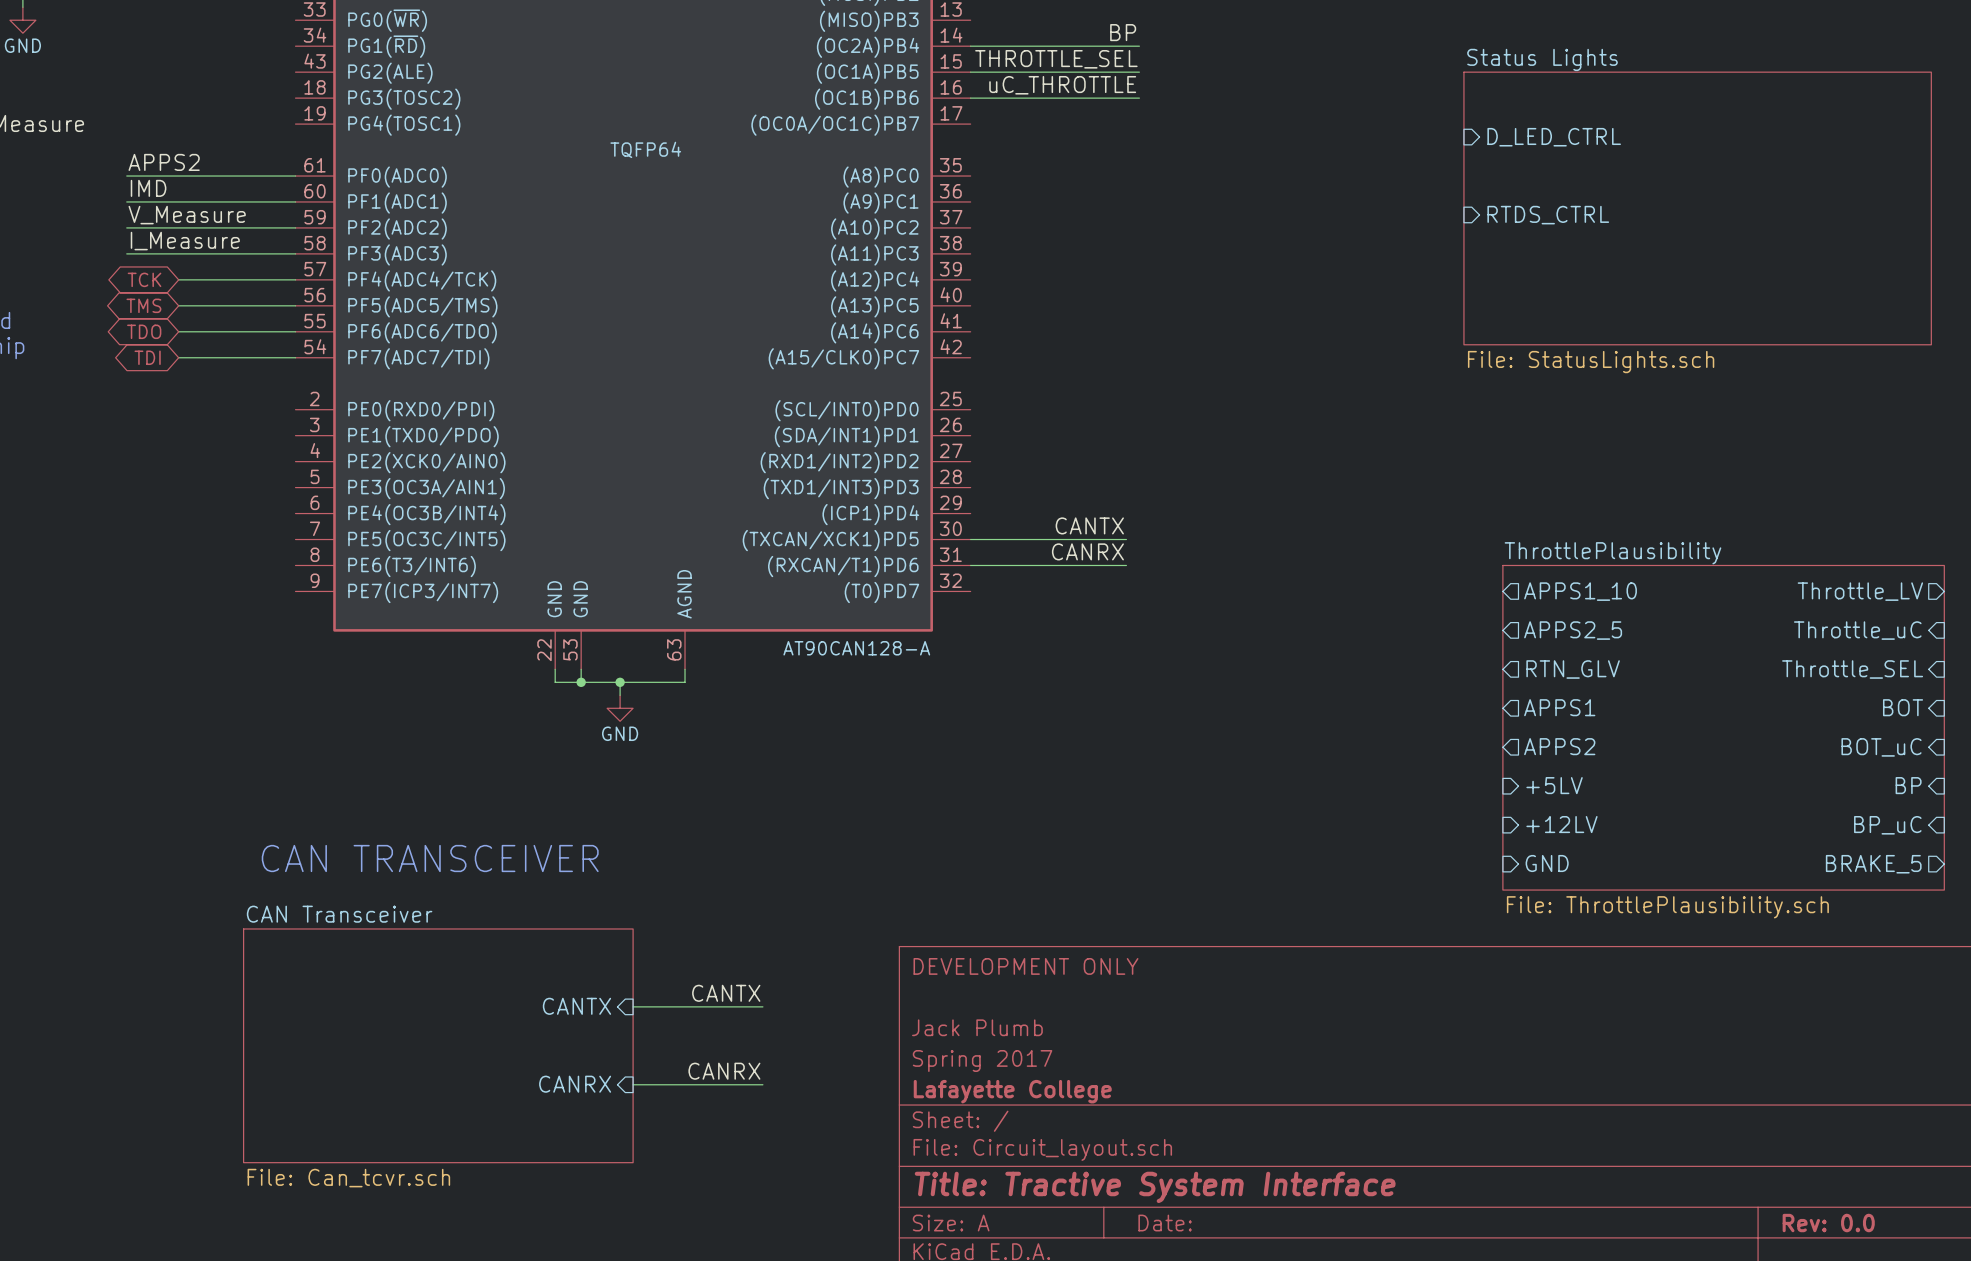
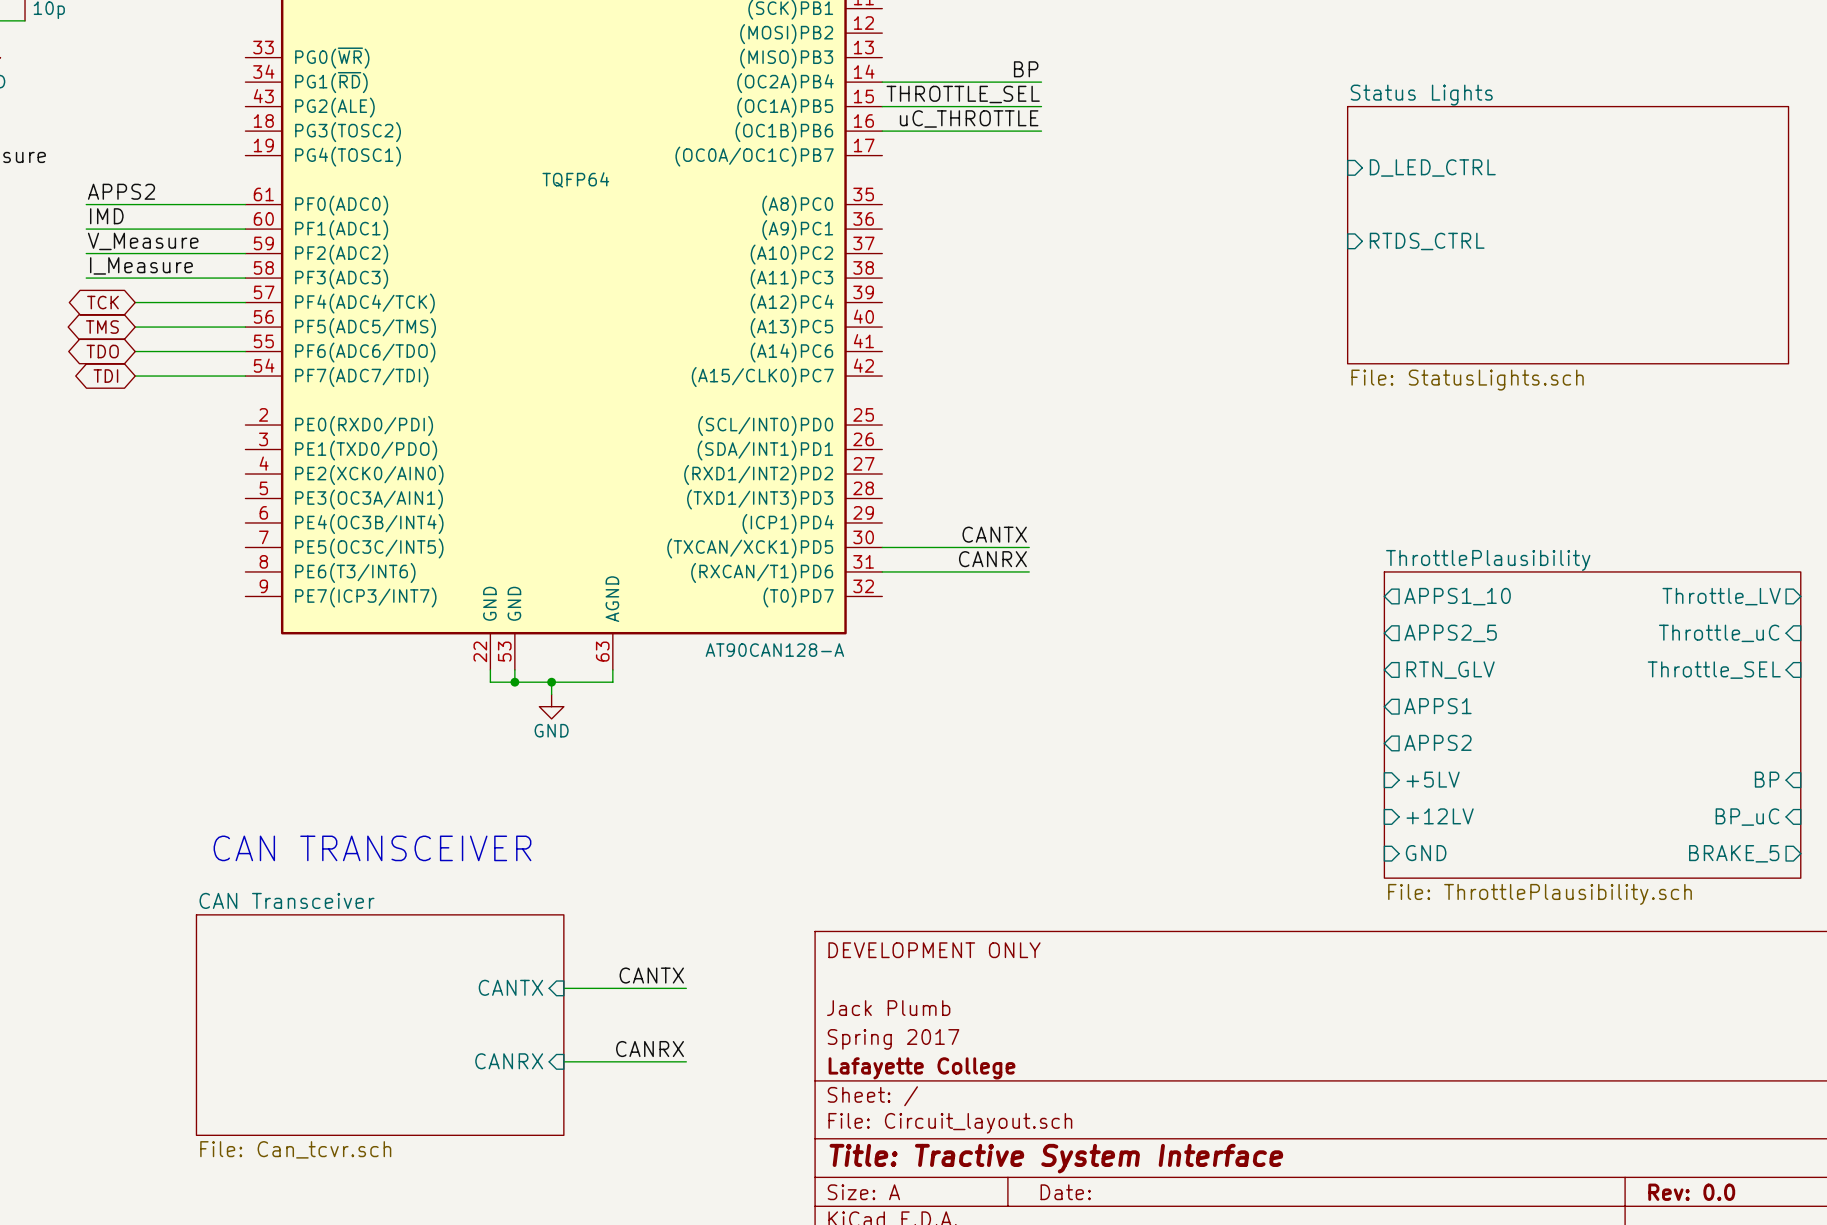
sheet pin: BOT (1903, 707) -> none
sheet pin: BOT_uC (1881, 747) -> none

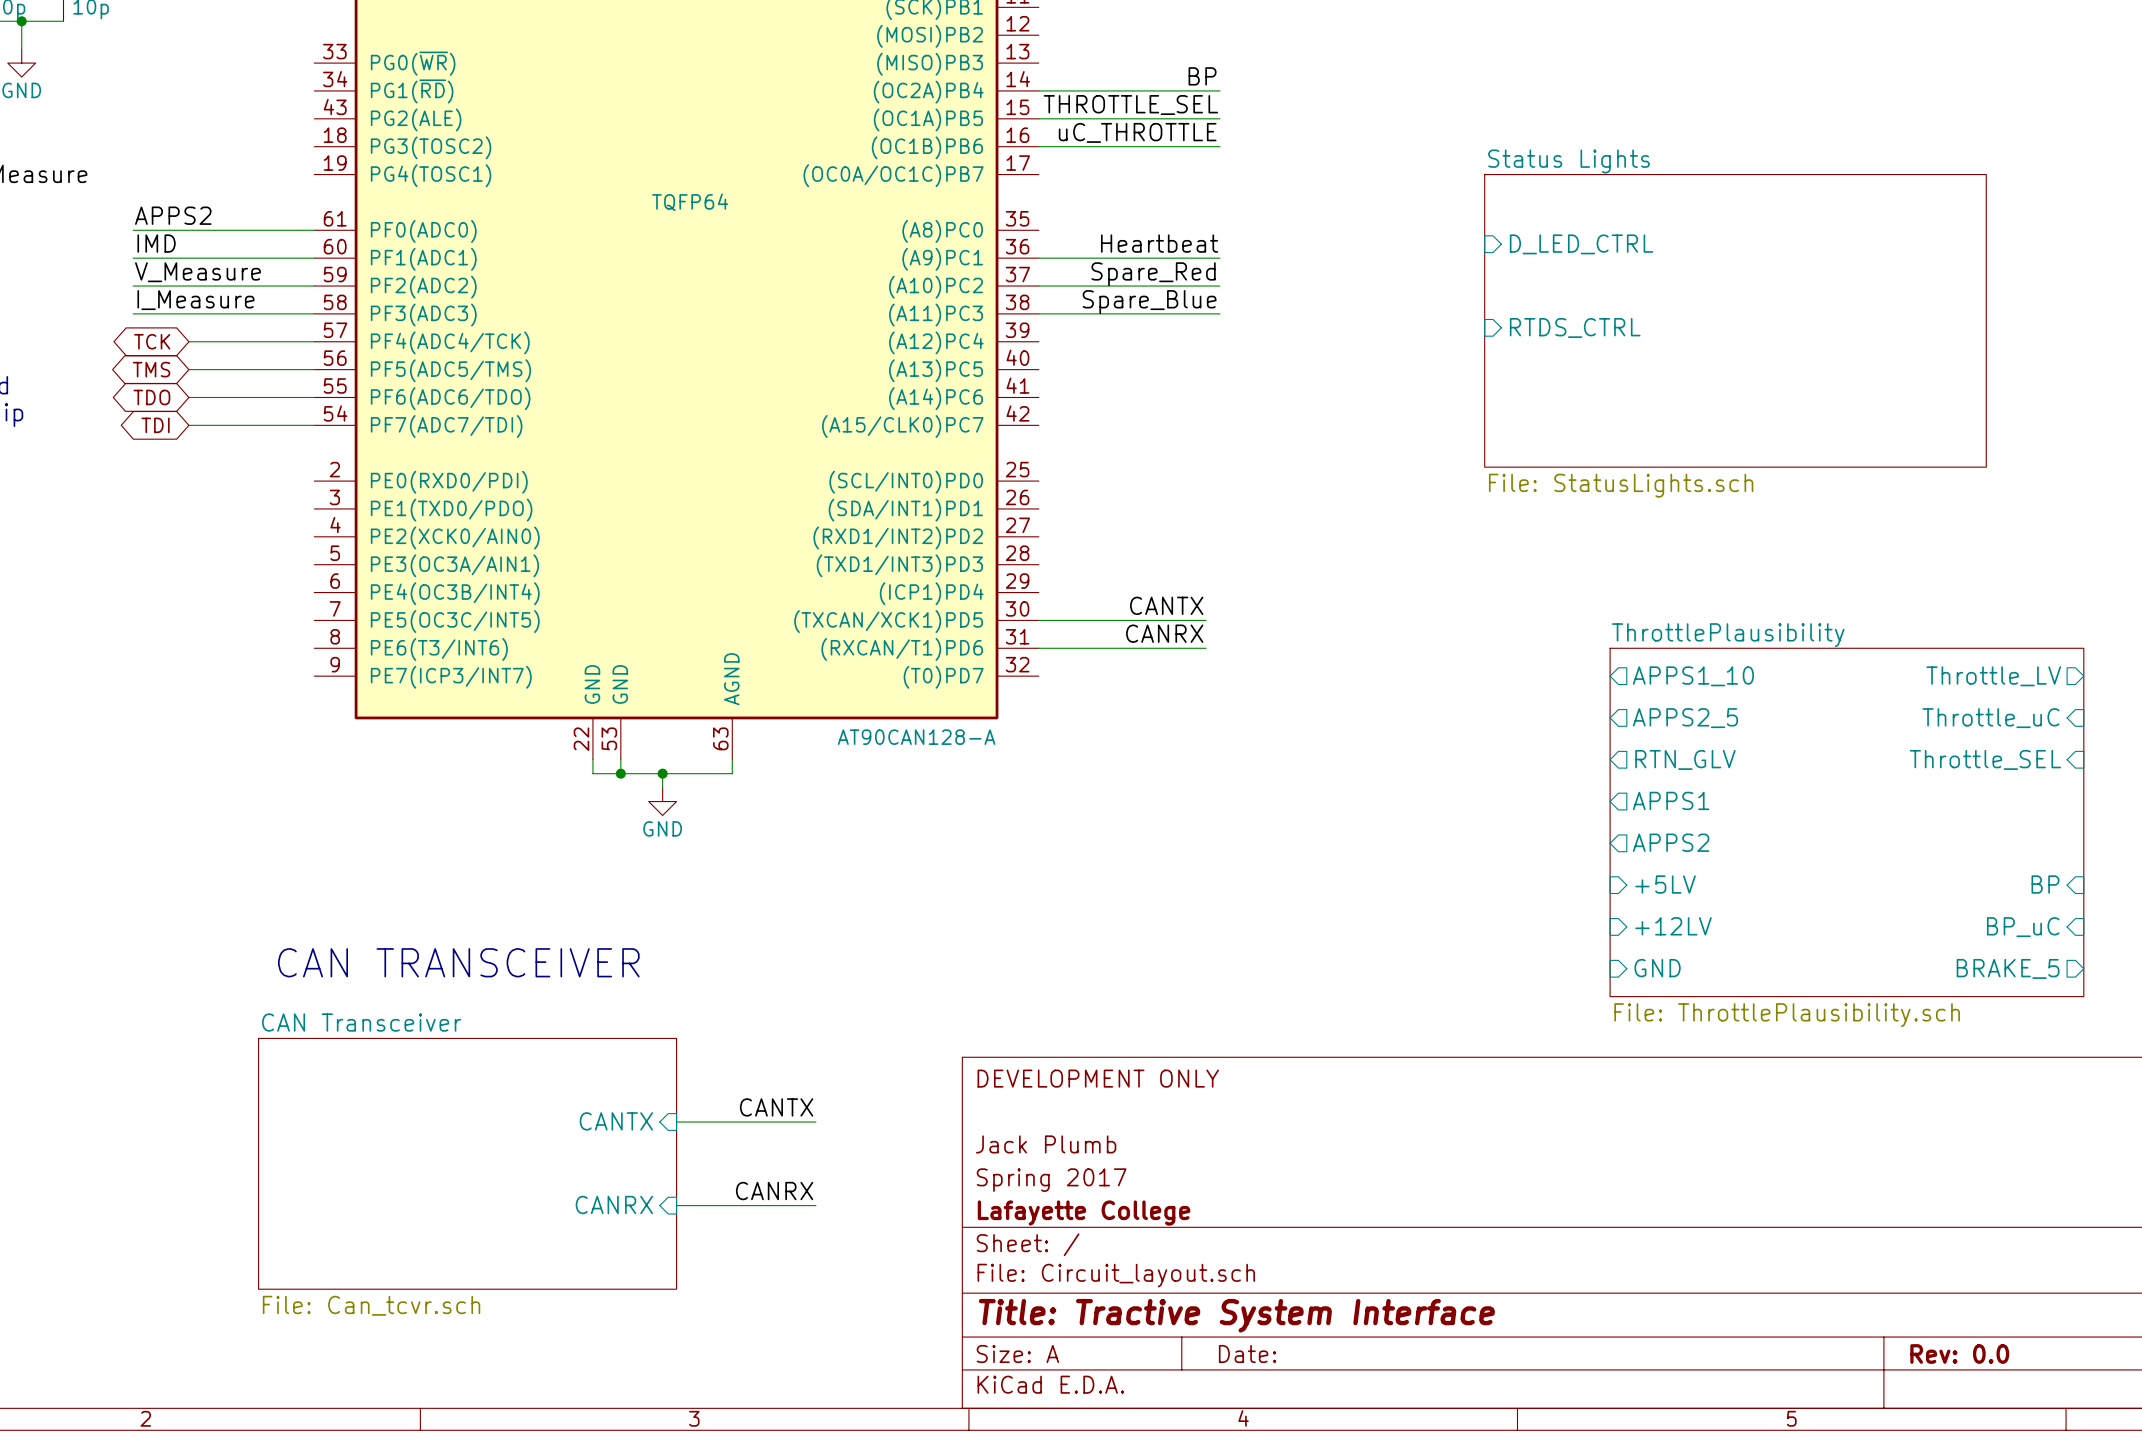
sheet pin position: D_LED_CTRL (1432, 167) -> D_LED_CTRL (1581, 244)
label: none -> Heartbeat (1159, 243)
wire: none -> (1038, 258) (1219, 258)
sheet Status Lights position: (1568, 235) -> (1735, 320)
sheet pin position: RTDS_CTRL (1427, 241) -> RTDS_CTRL (1575, 327)
label: none -> Spare_Red (1153, 274)
wire: none -> (1038, 286) (1219, 286)
label: none -> Spare_Blue (1149, 302)
wire: none -> (1038, 313) (1219, 313)

